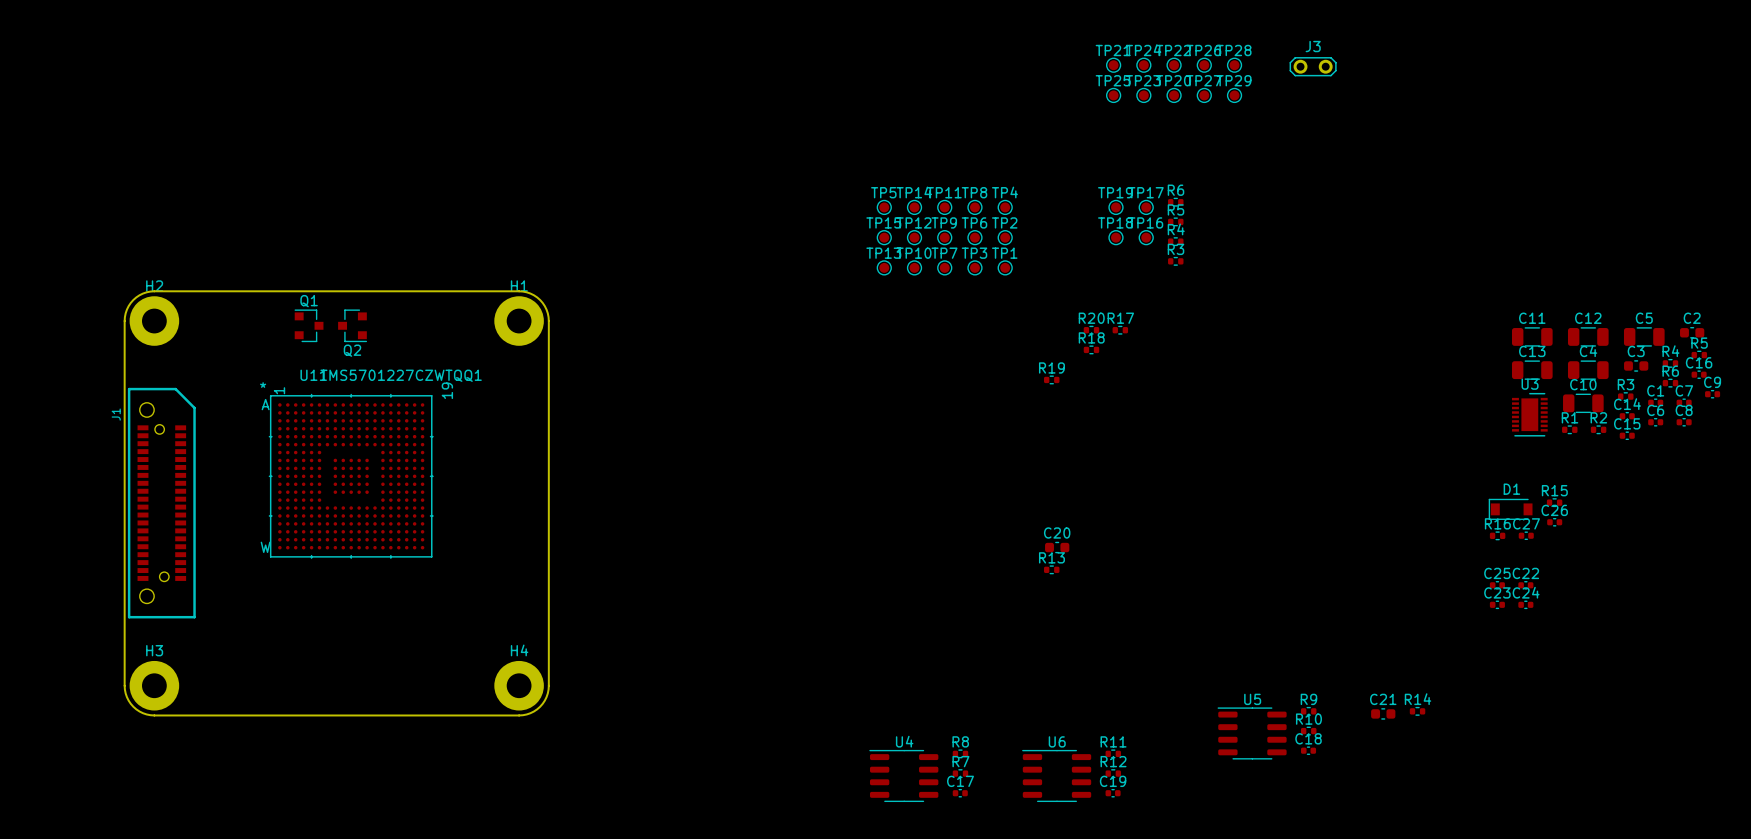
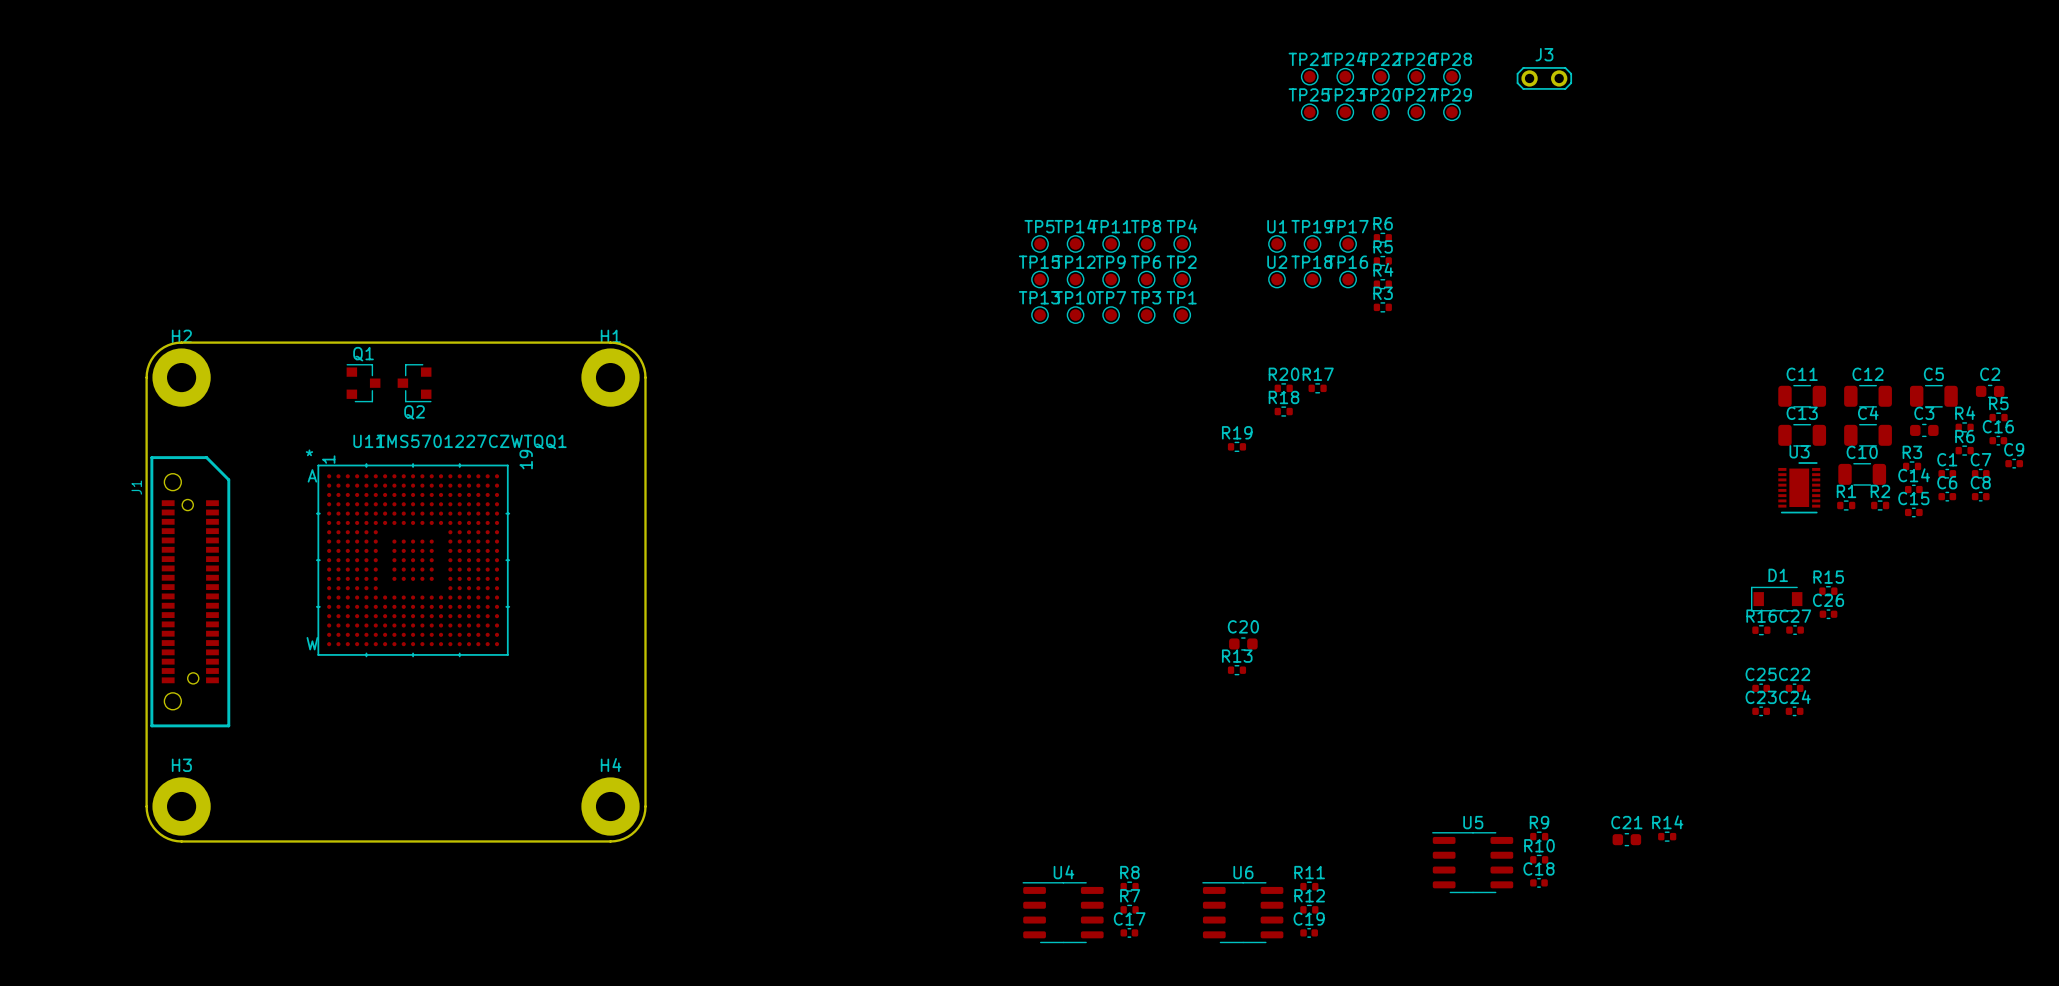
U1: none -> (1276, 243)
U2: none -> (1276, 279)

